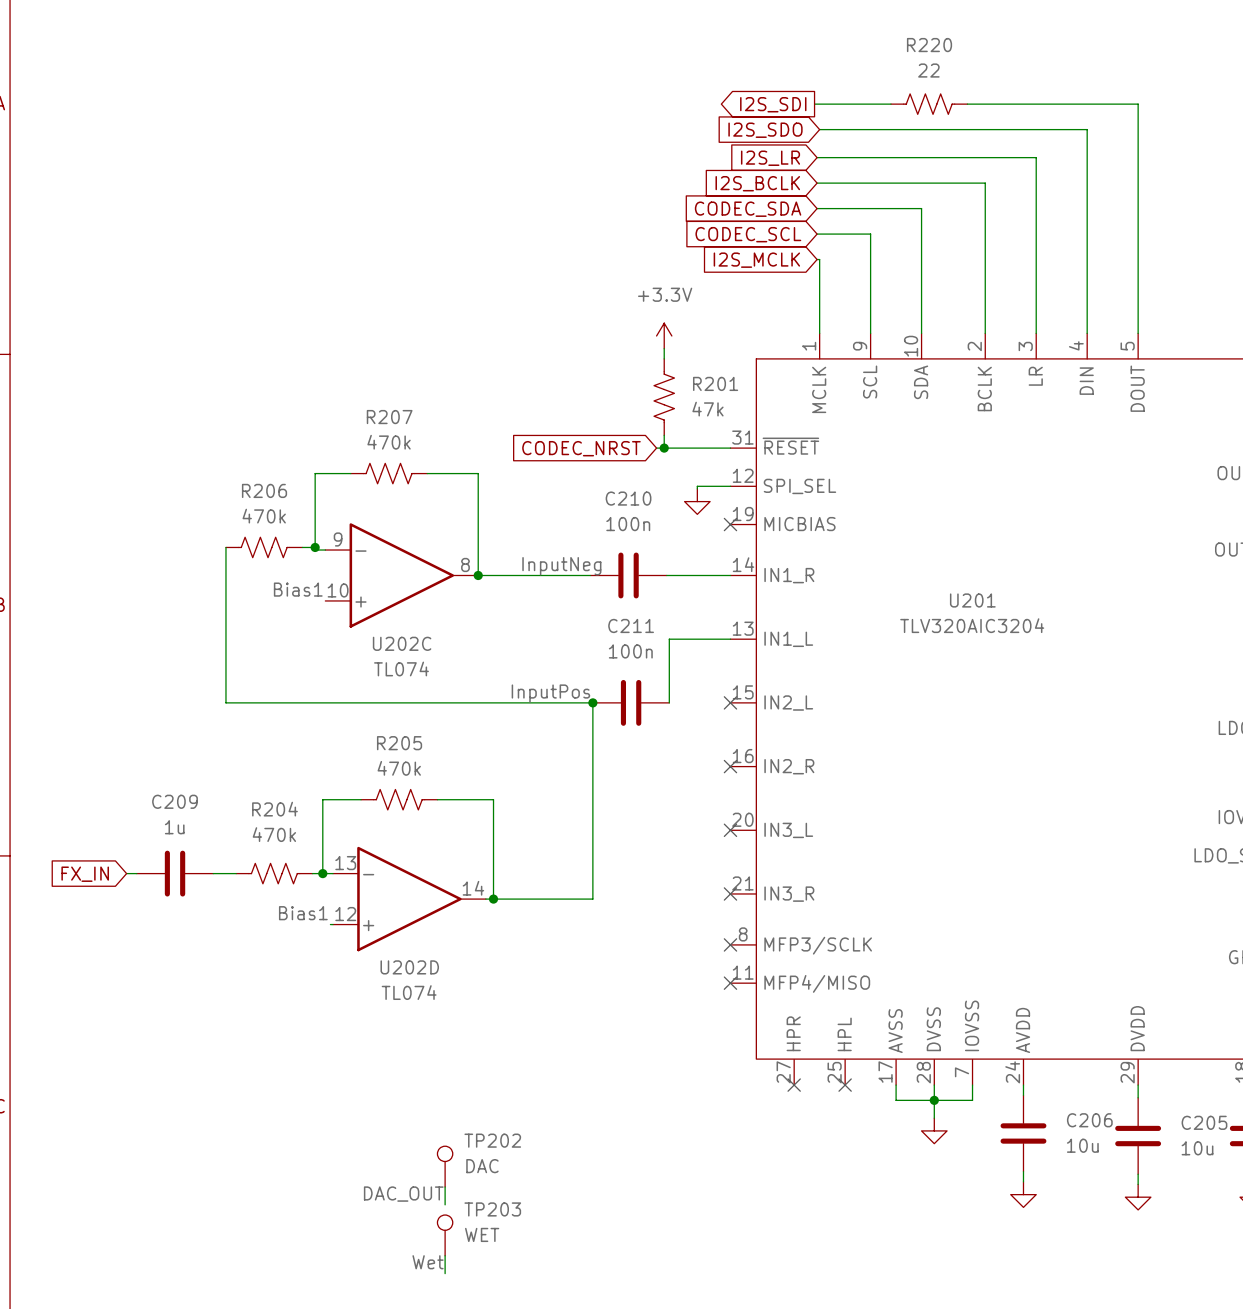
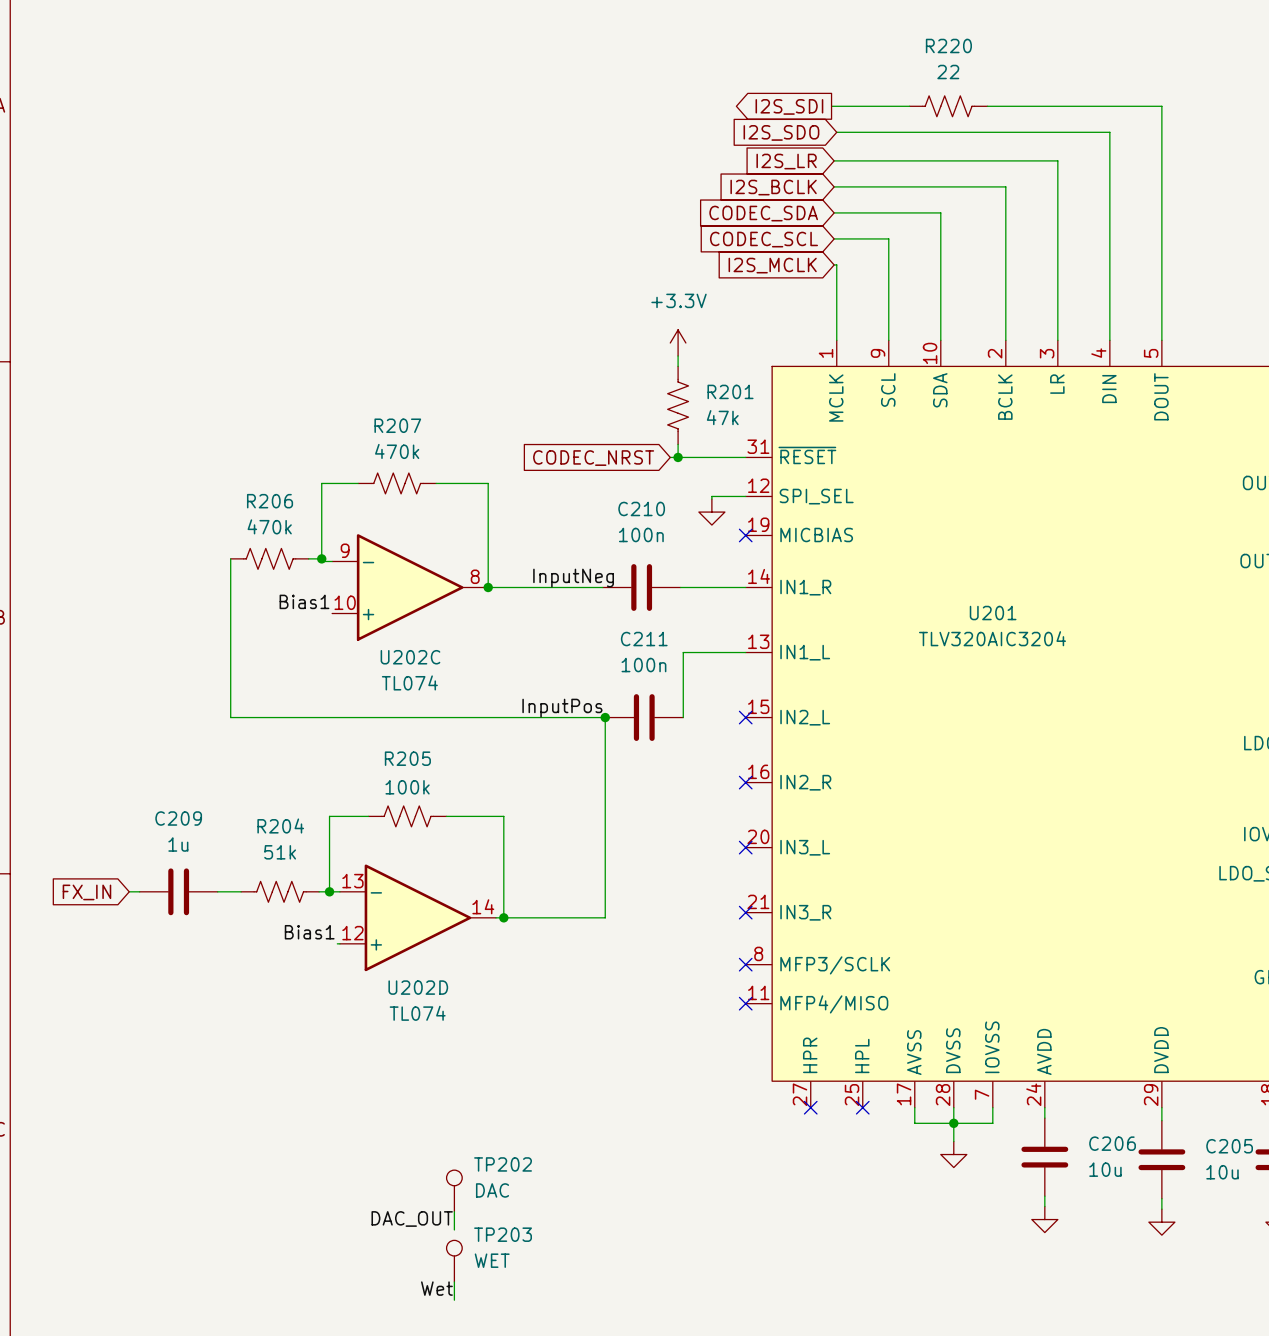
R205 value: 470k (399, 768) -> 100k (407, 787)
R204 value: 470k (274, 834) -> 51k (280, 852)

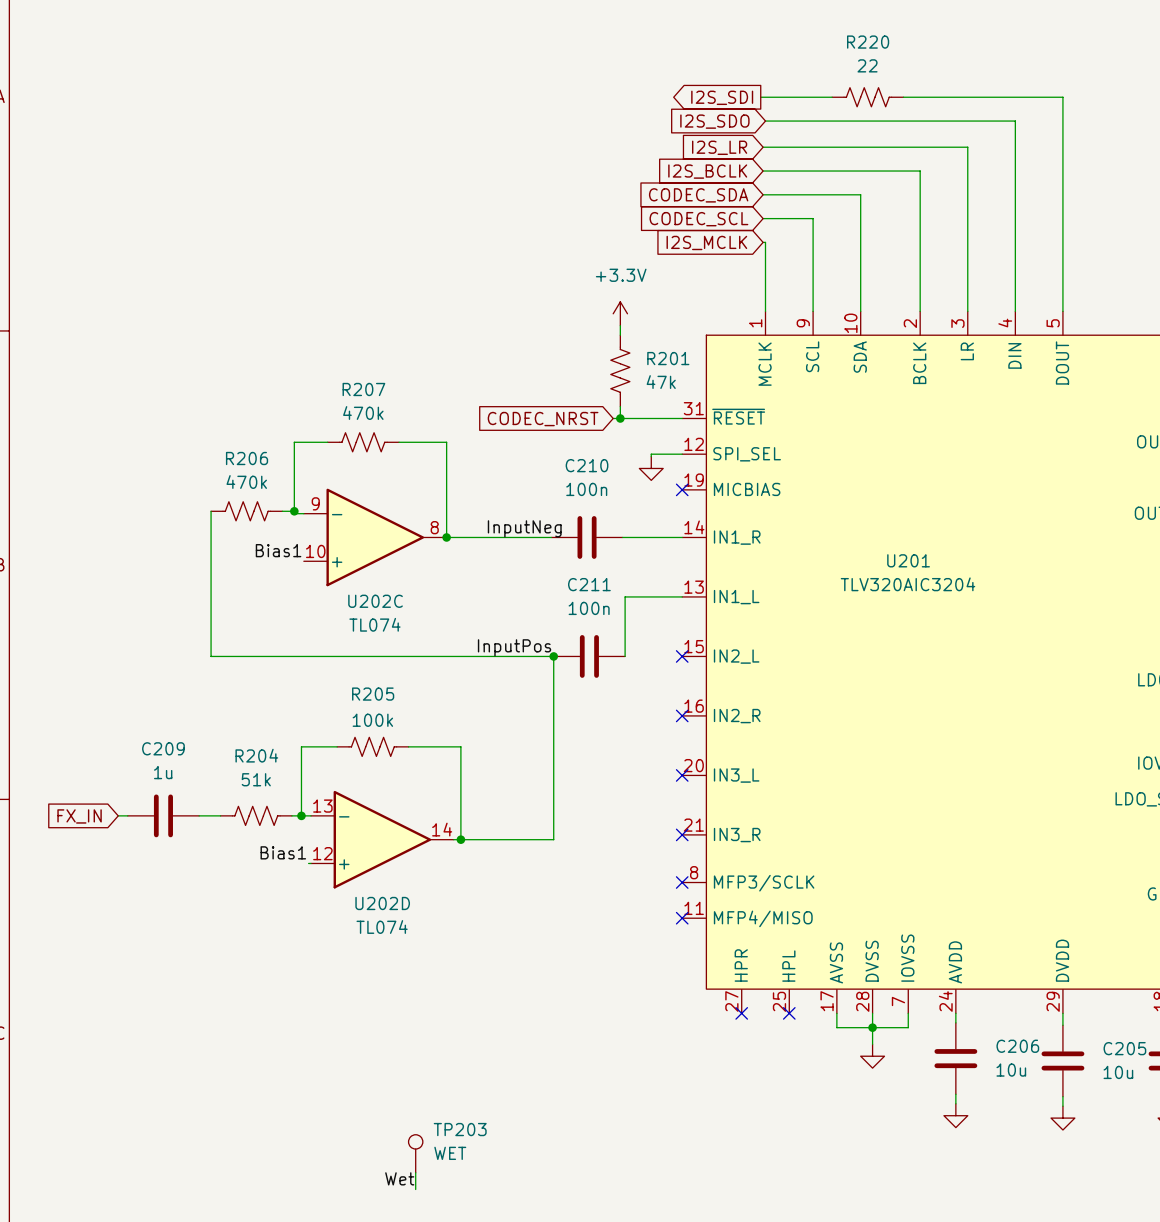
TP202: DAC (454, 1190) -> none
wire: (454, 1211) (454, 1229) -> none
label: DAC_OUT (412, 1218) -> none

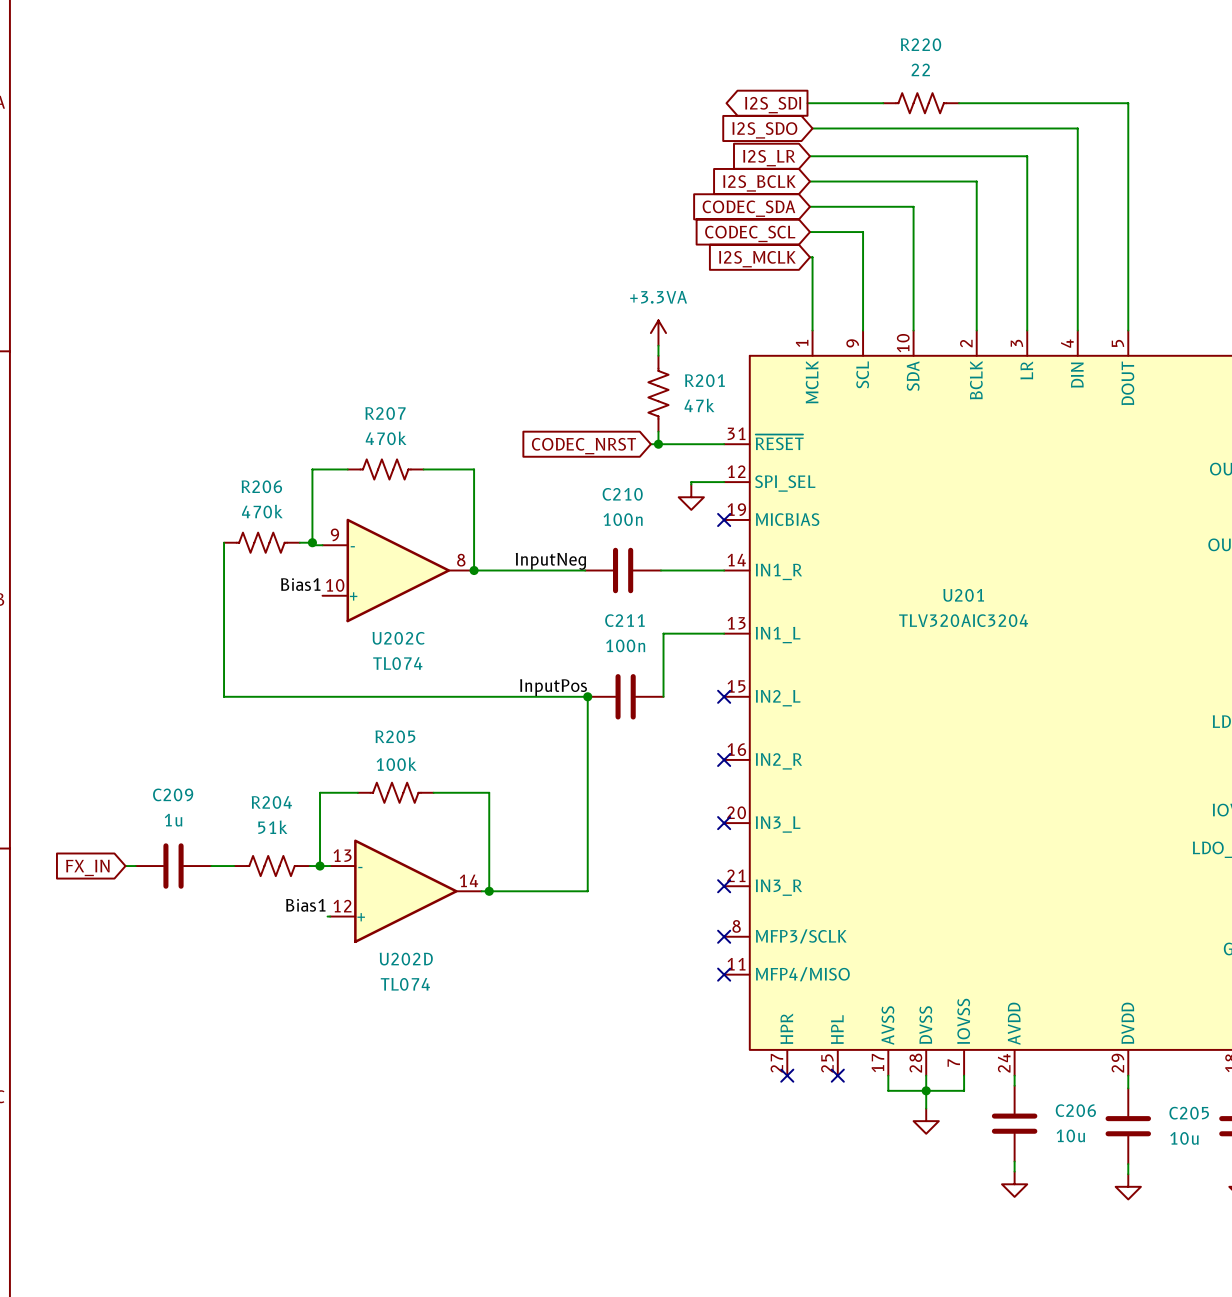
power symbol: +3.3V (620, 313) -> +3.3VA (658, 333)
TP203: WET (415, 1153) -> none
wire: (415, 1172) (415, 1189) -> none
label: Wet (399, 1178) -> none

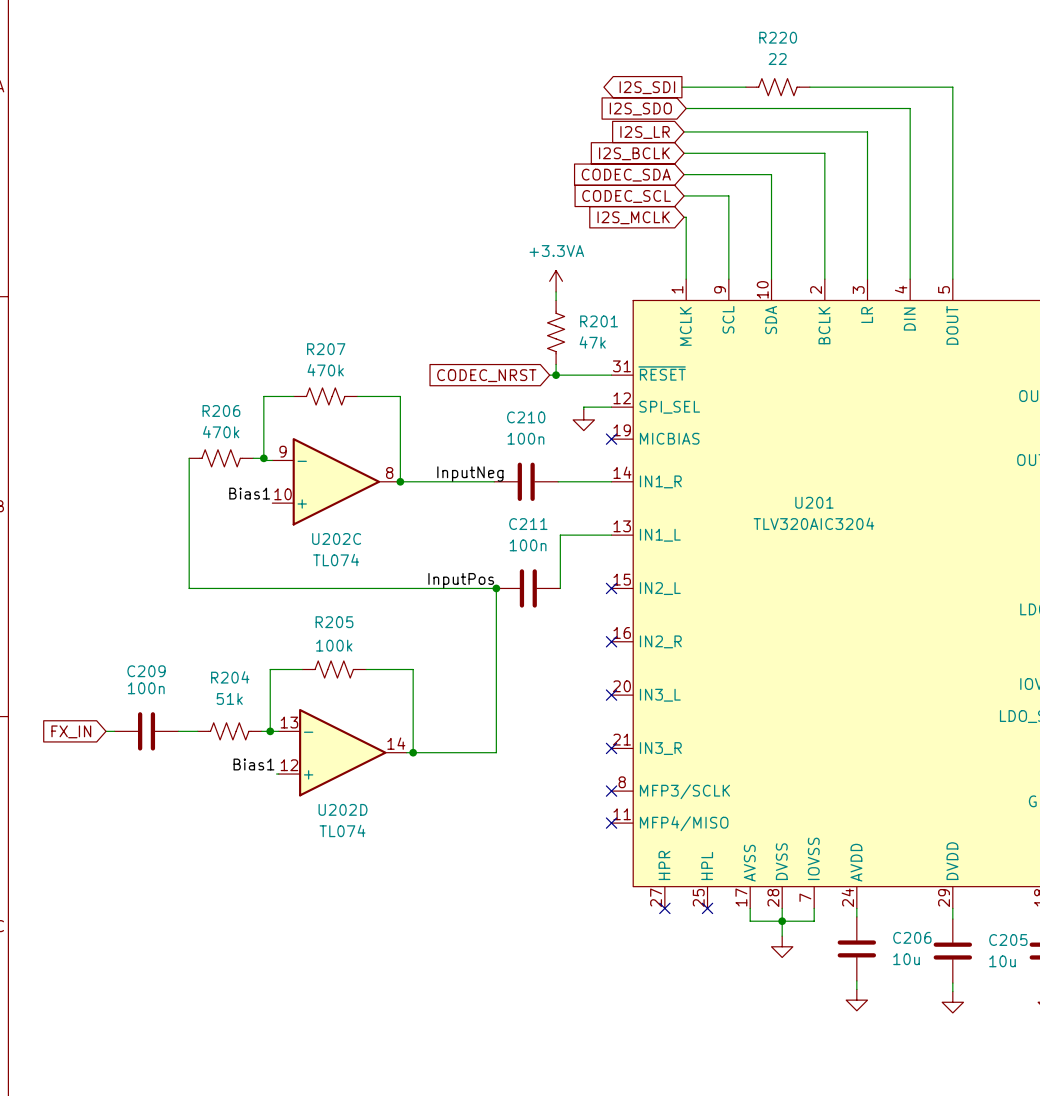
C209 value: 1u (173, 820) -> 100n (146, 688)

